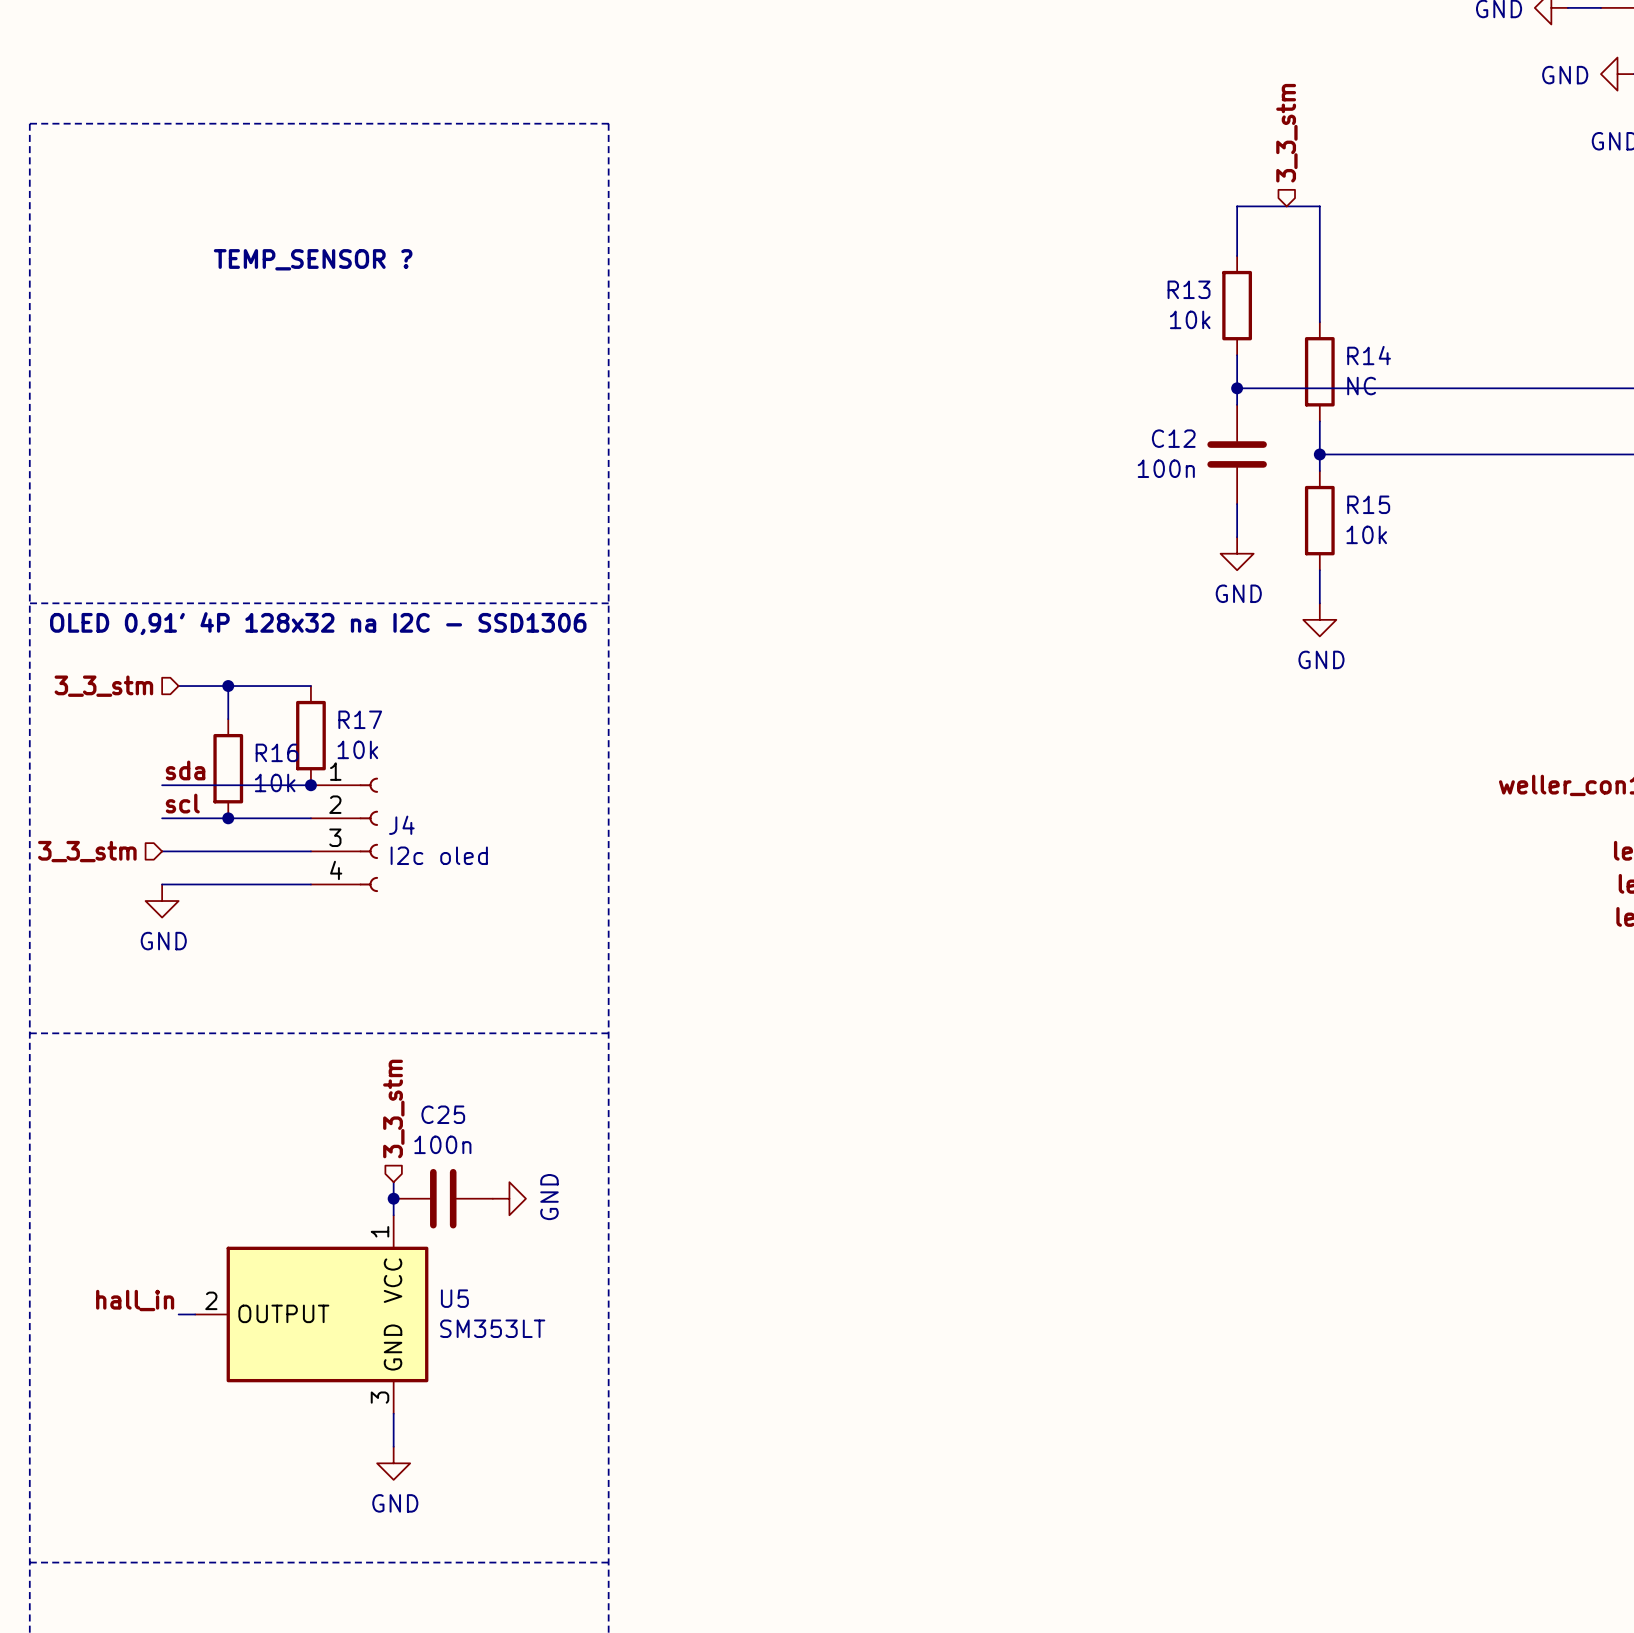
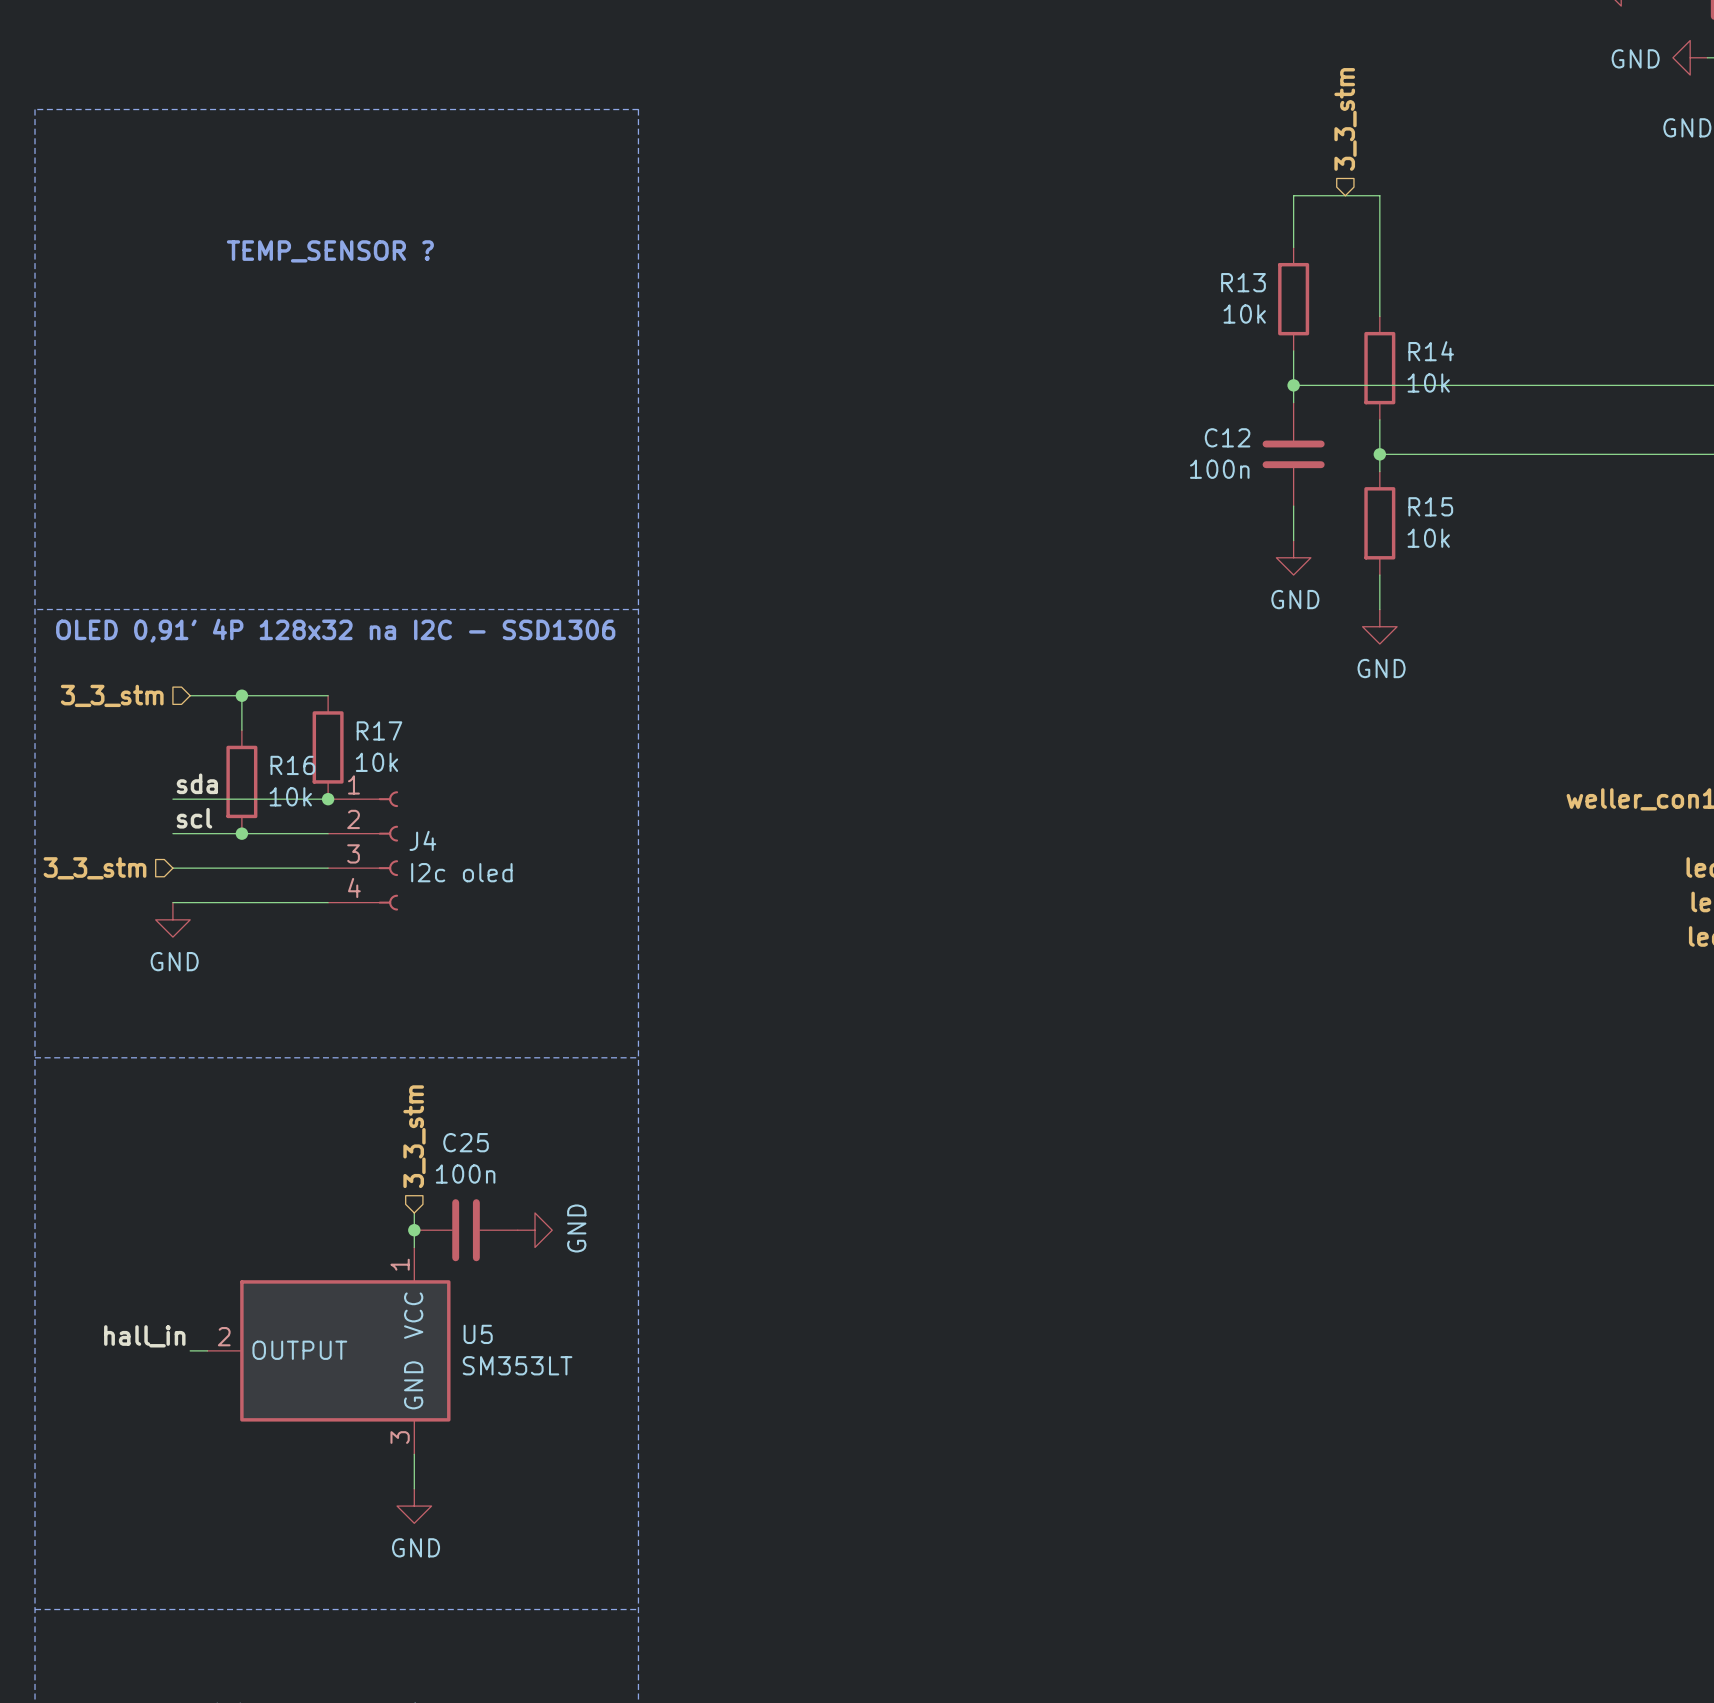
R14 value: NC (1361, 386) -> 10k (1428, 383)

